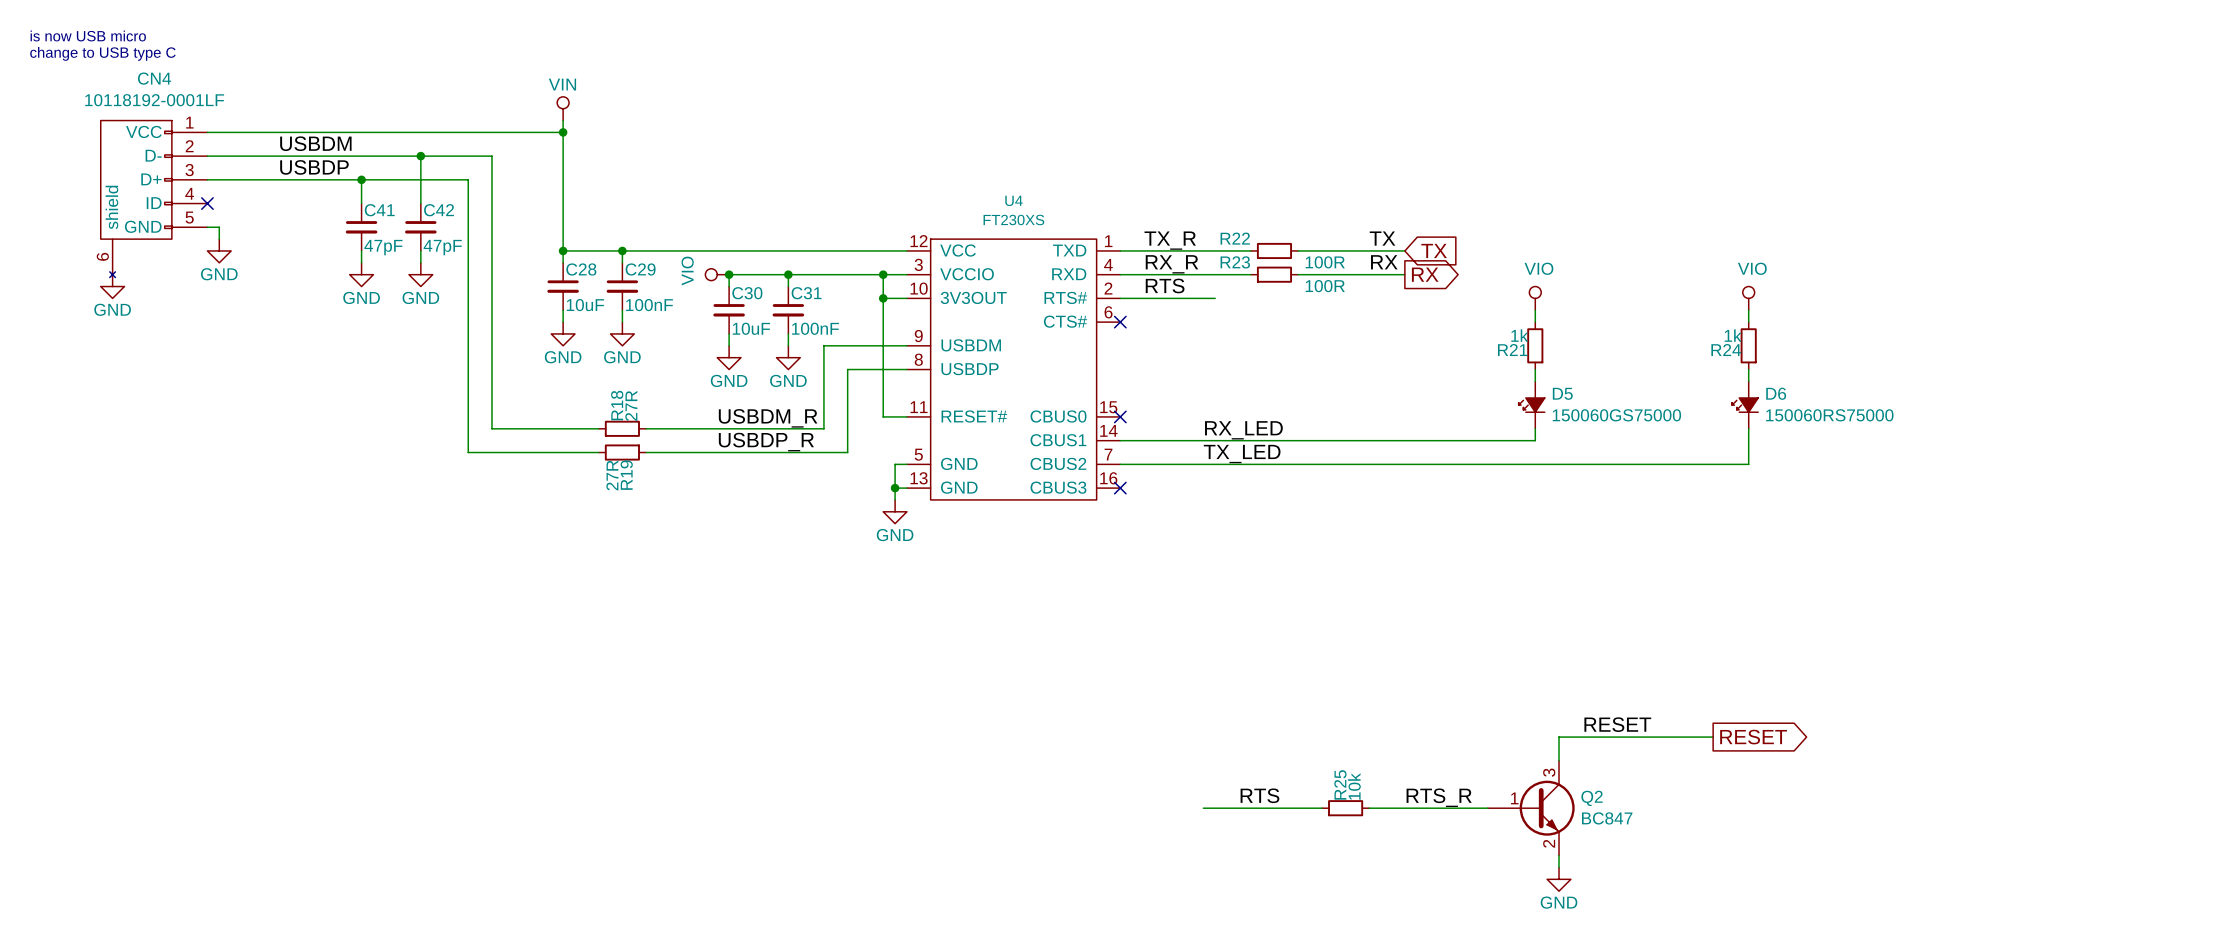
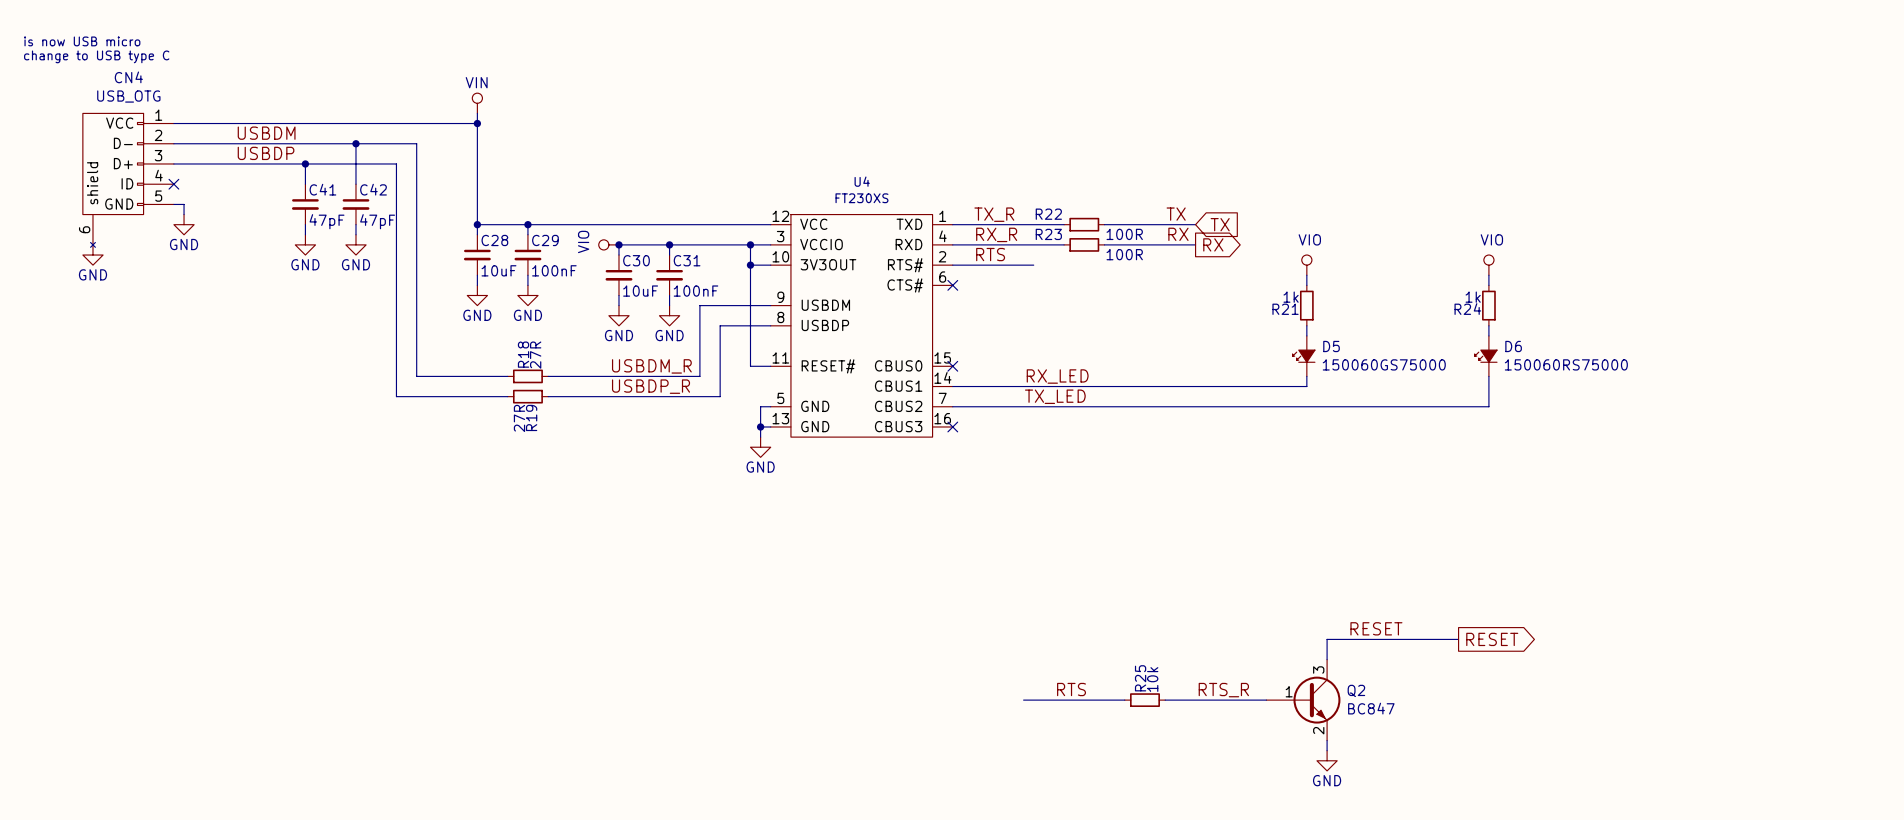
CN4 value: 10118192-0001LF (154, 100) -> USB_OTG (128, 96)

